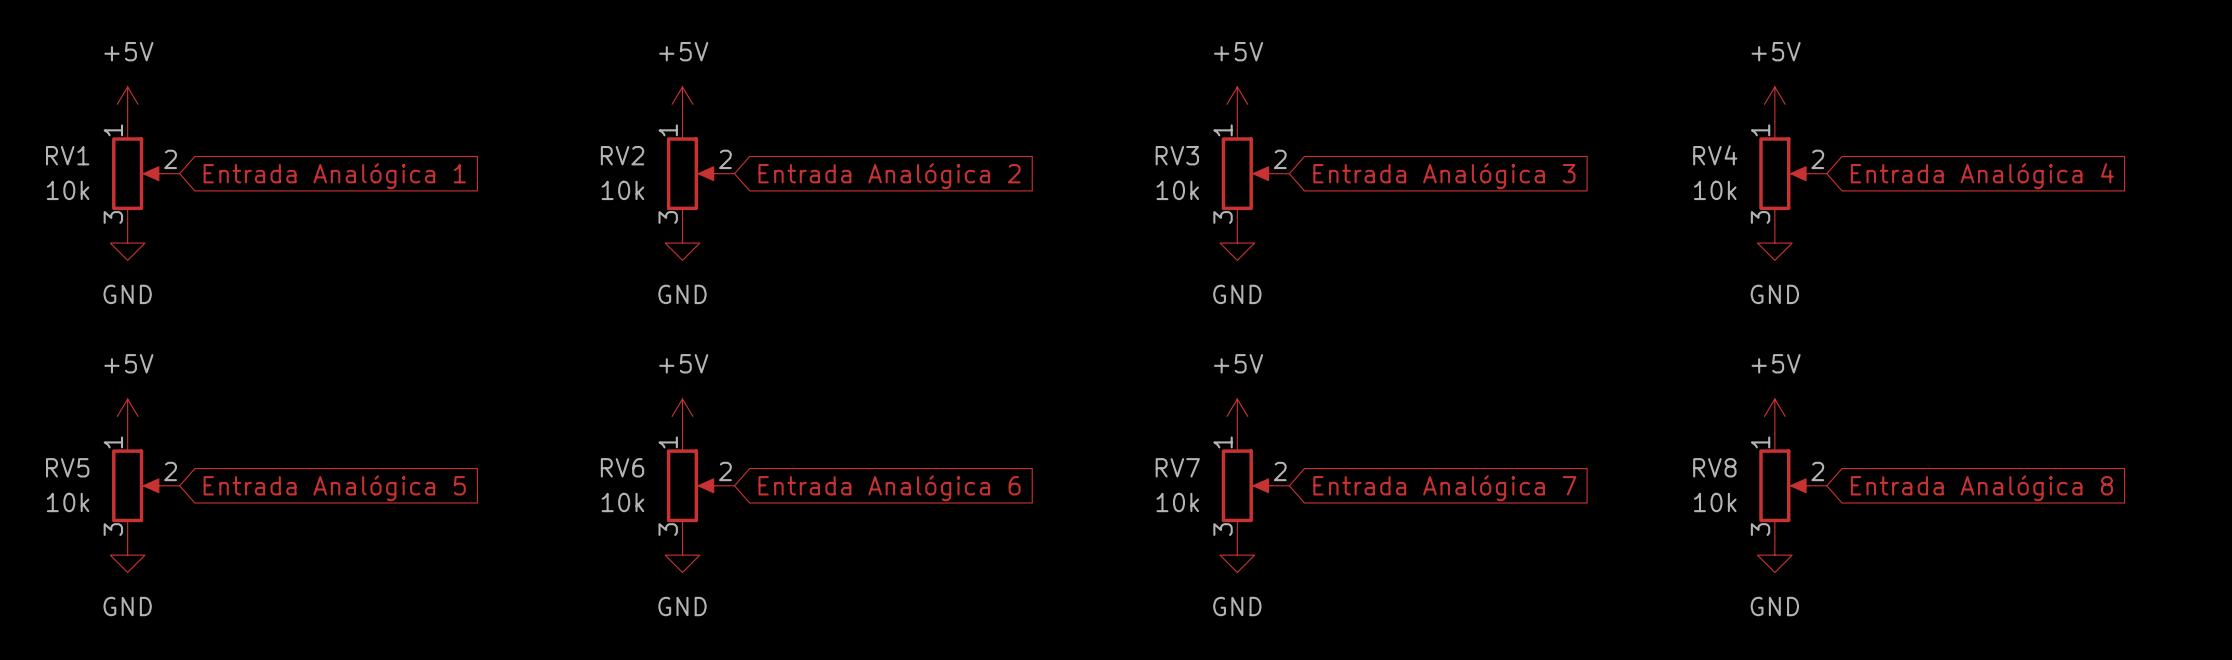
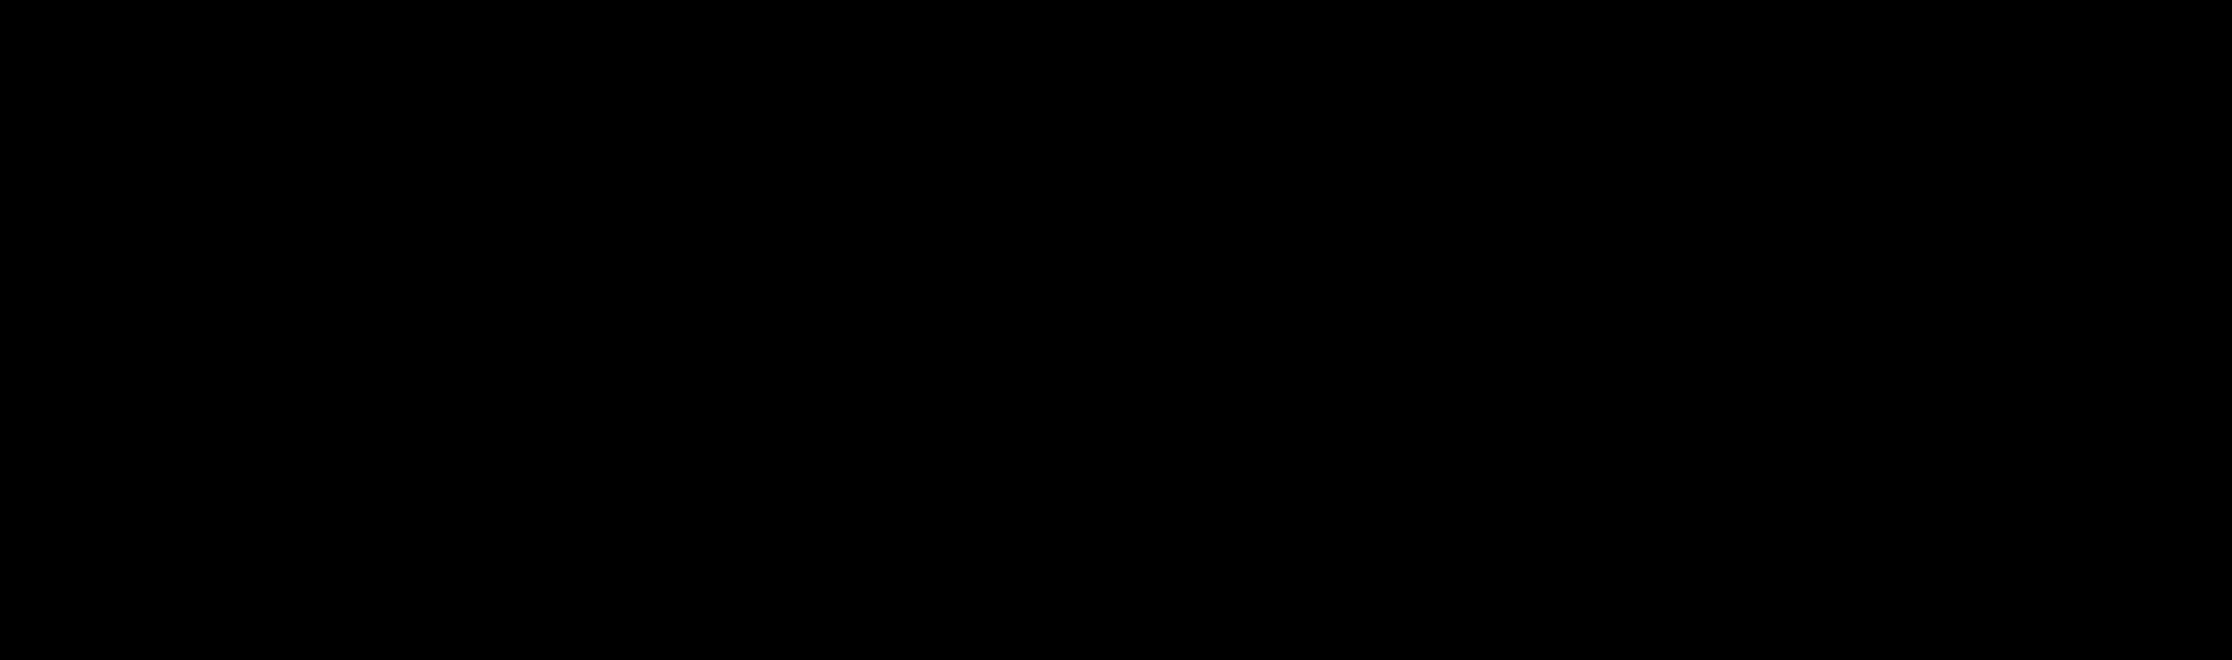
power symbol: +5V (127, 104) -> none
power symbol: +5V (682, 104) -> none
power symbol: +5V (1237, 104) -> none
power symbol: +5V (1774, 104) -> none
RV1: 10k (145, 173) -> none
RV2: 10k (700, 173) -> none
RV3: 10k (1255, 173) -> none
RV4: 10k (1793, 173) -> none
global label: Entrada Analógica 1 (334, 176) -> none
global label: Entrada Analógica 2 (889, 176) -> none
global label: Entrada Analógica 3 (1444, 176) -> none
global label: Entrada Analógica 4 (1982, 176) -> none
power symbol: GND (127, 243) -> none
power symbol: GND (682, 243) -> none
power symbol: GND (1237, 243) -> none
power symbol: GND (1774, 243) -> none
power symbol: +5V (127, 416) -> none
power symbol: +5V (682, 416) -> none
power symbol: +5V (1237, 416) -> none
power symbol: +5V (1774, 416) -> none
RV5: 10k (145, 485) -> none
RV6: 10k (700, 485) -> none
RV7: 10k (1255, 485) -> none
RV8: 10k (1793, 485) -> none
global label: Entrada Analógica 5 (334, 488) -> none
global label: Entrada Analógica 6 (889, 488) -> none
global label: Entrada Analógica 7 (1444, 488) -> none
global label: Entrada Analógica 8 (1981, 488) -> none
power symbol: GND (127, 555) -> none
power symbol: GND (682, 555) -> none
power symbol: GND (1237, 555) -> none
power symbol: GND (1774, 555) -> none

